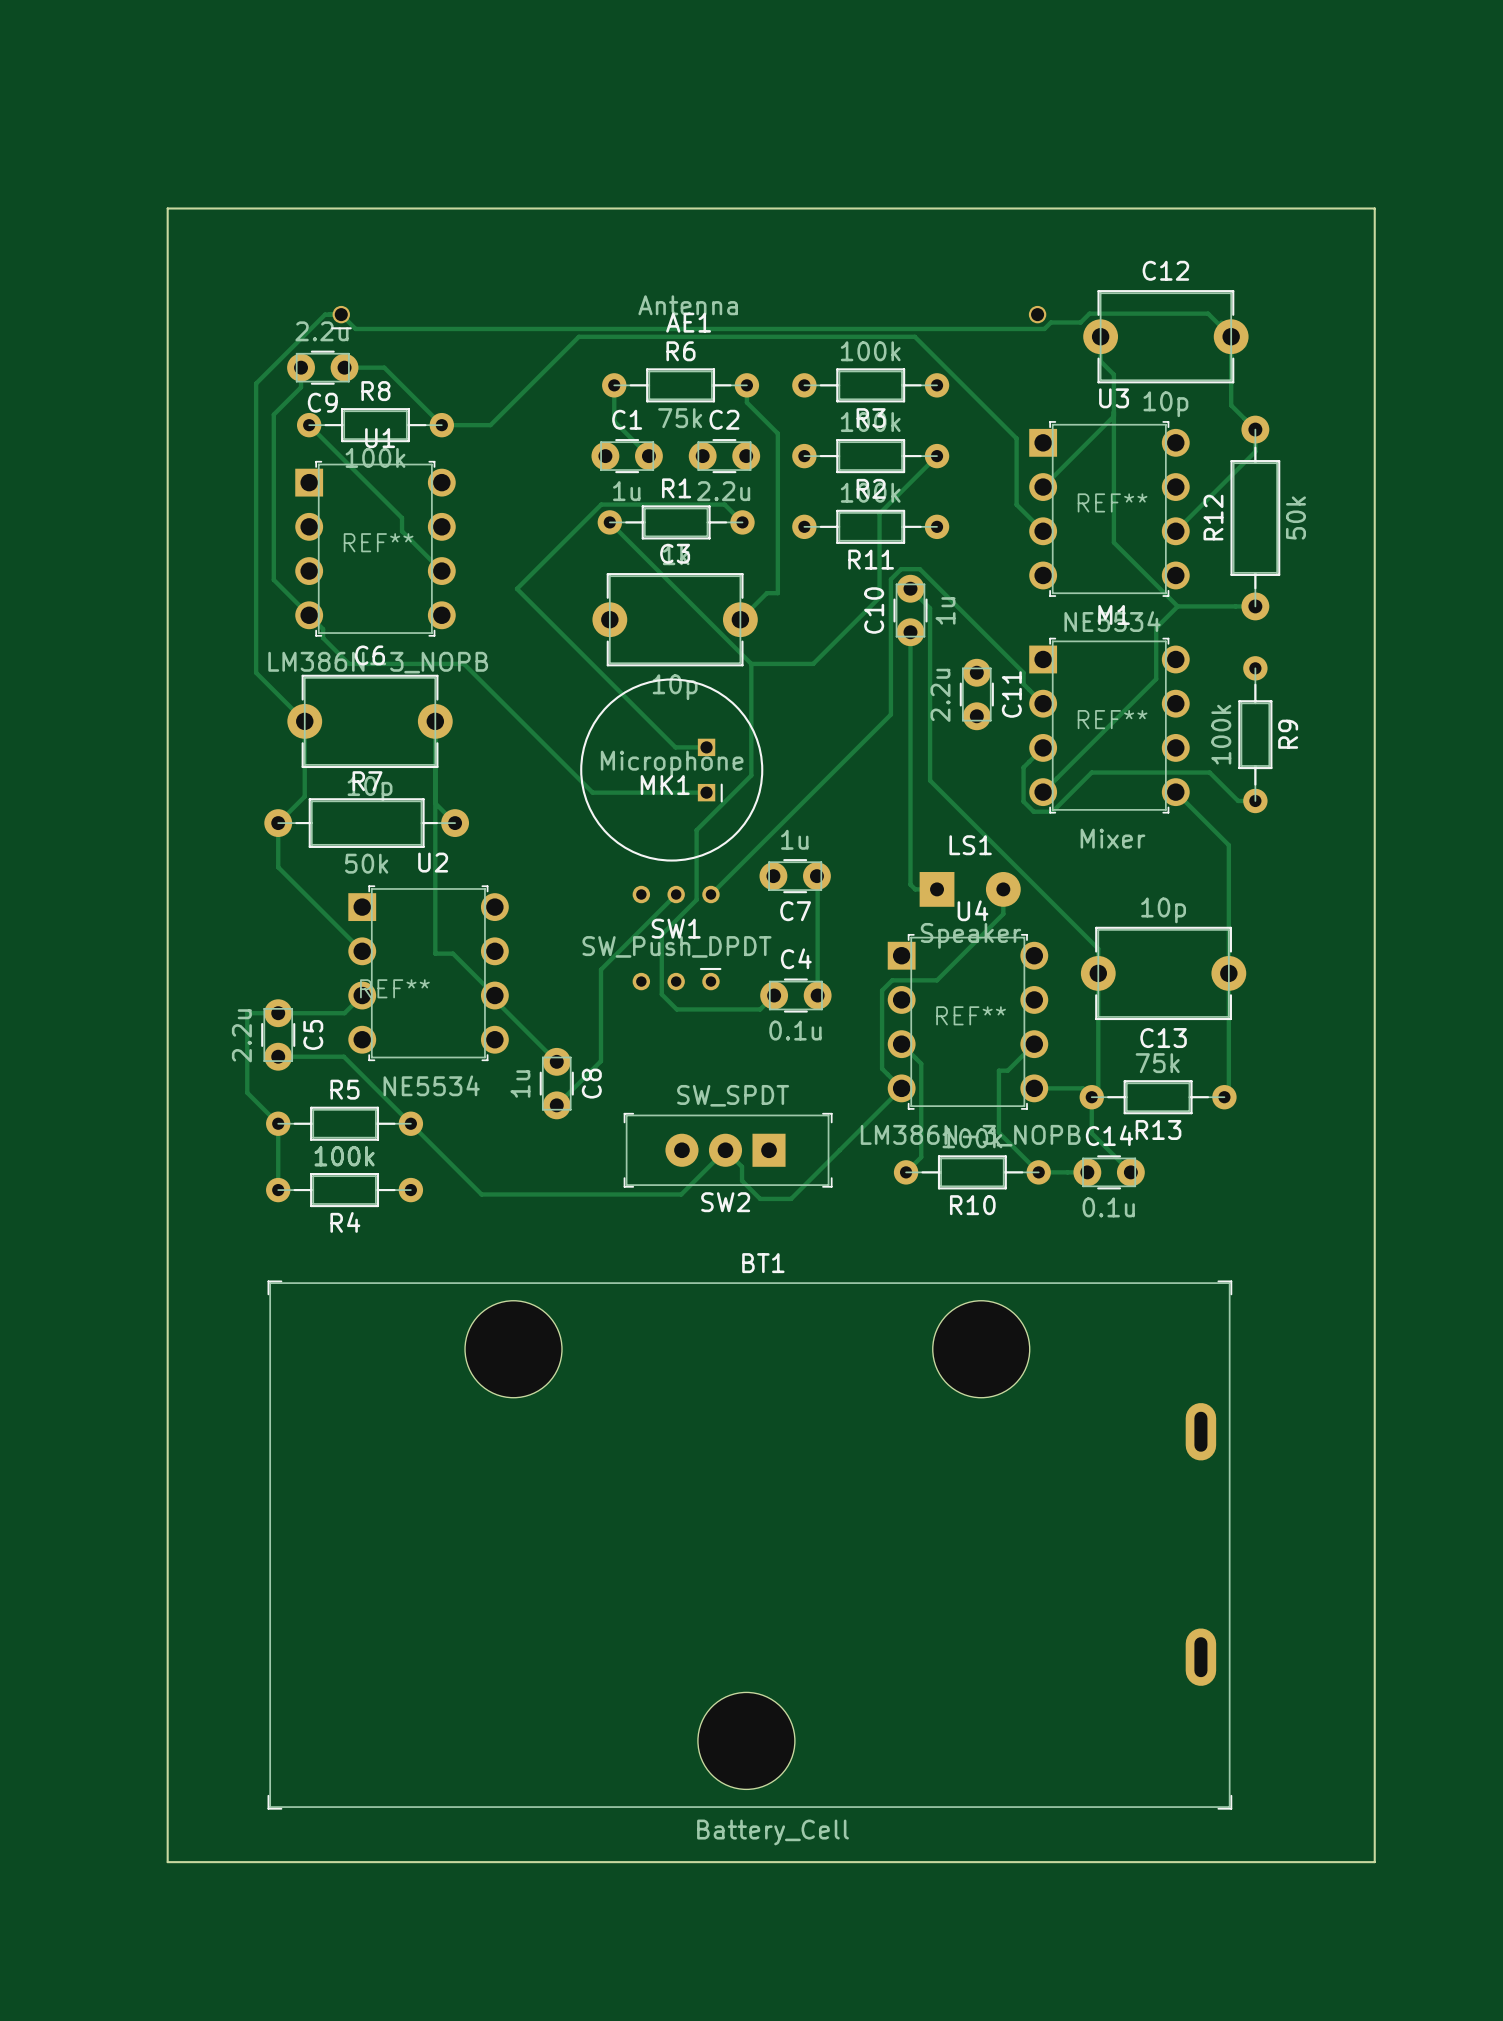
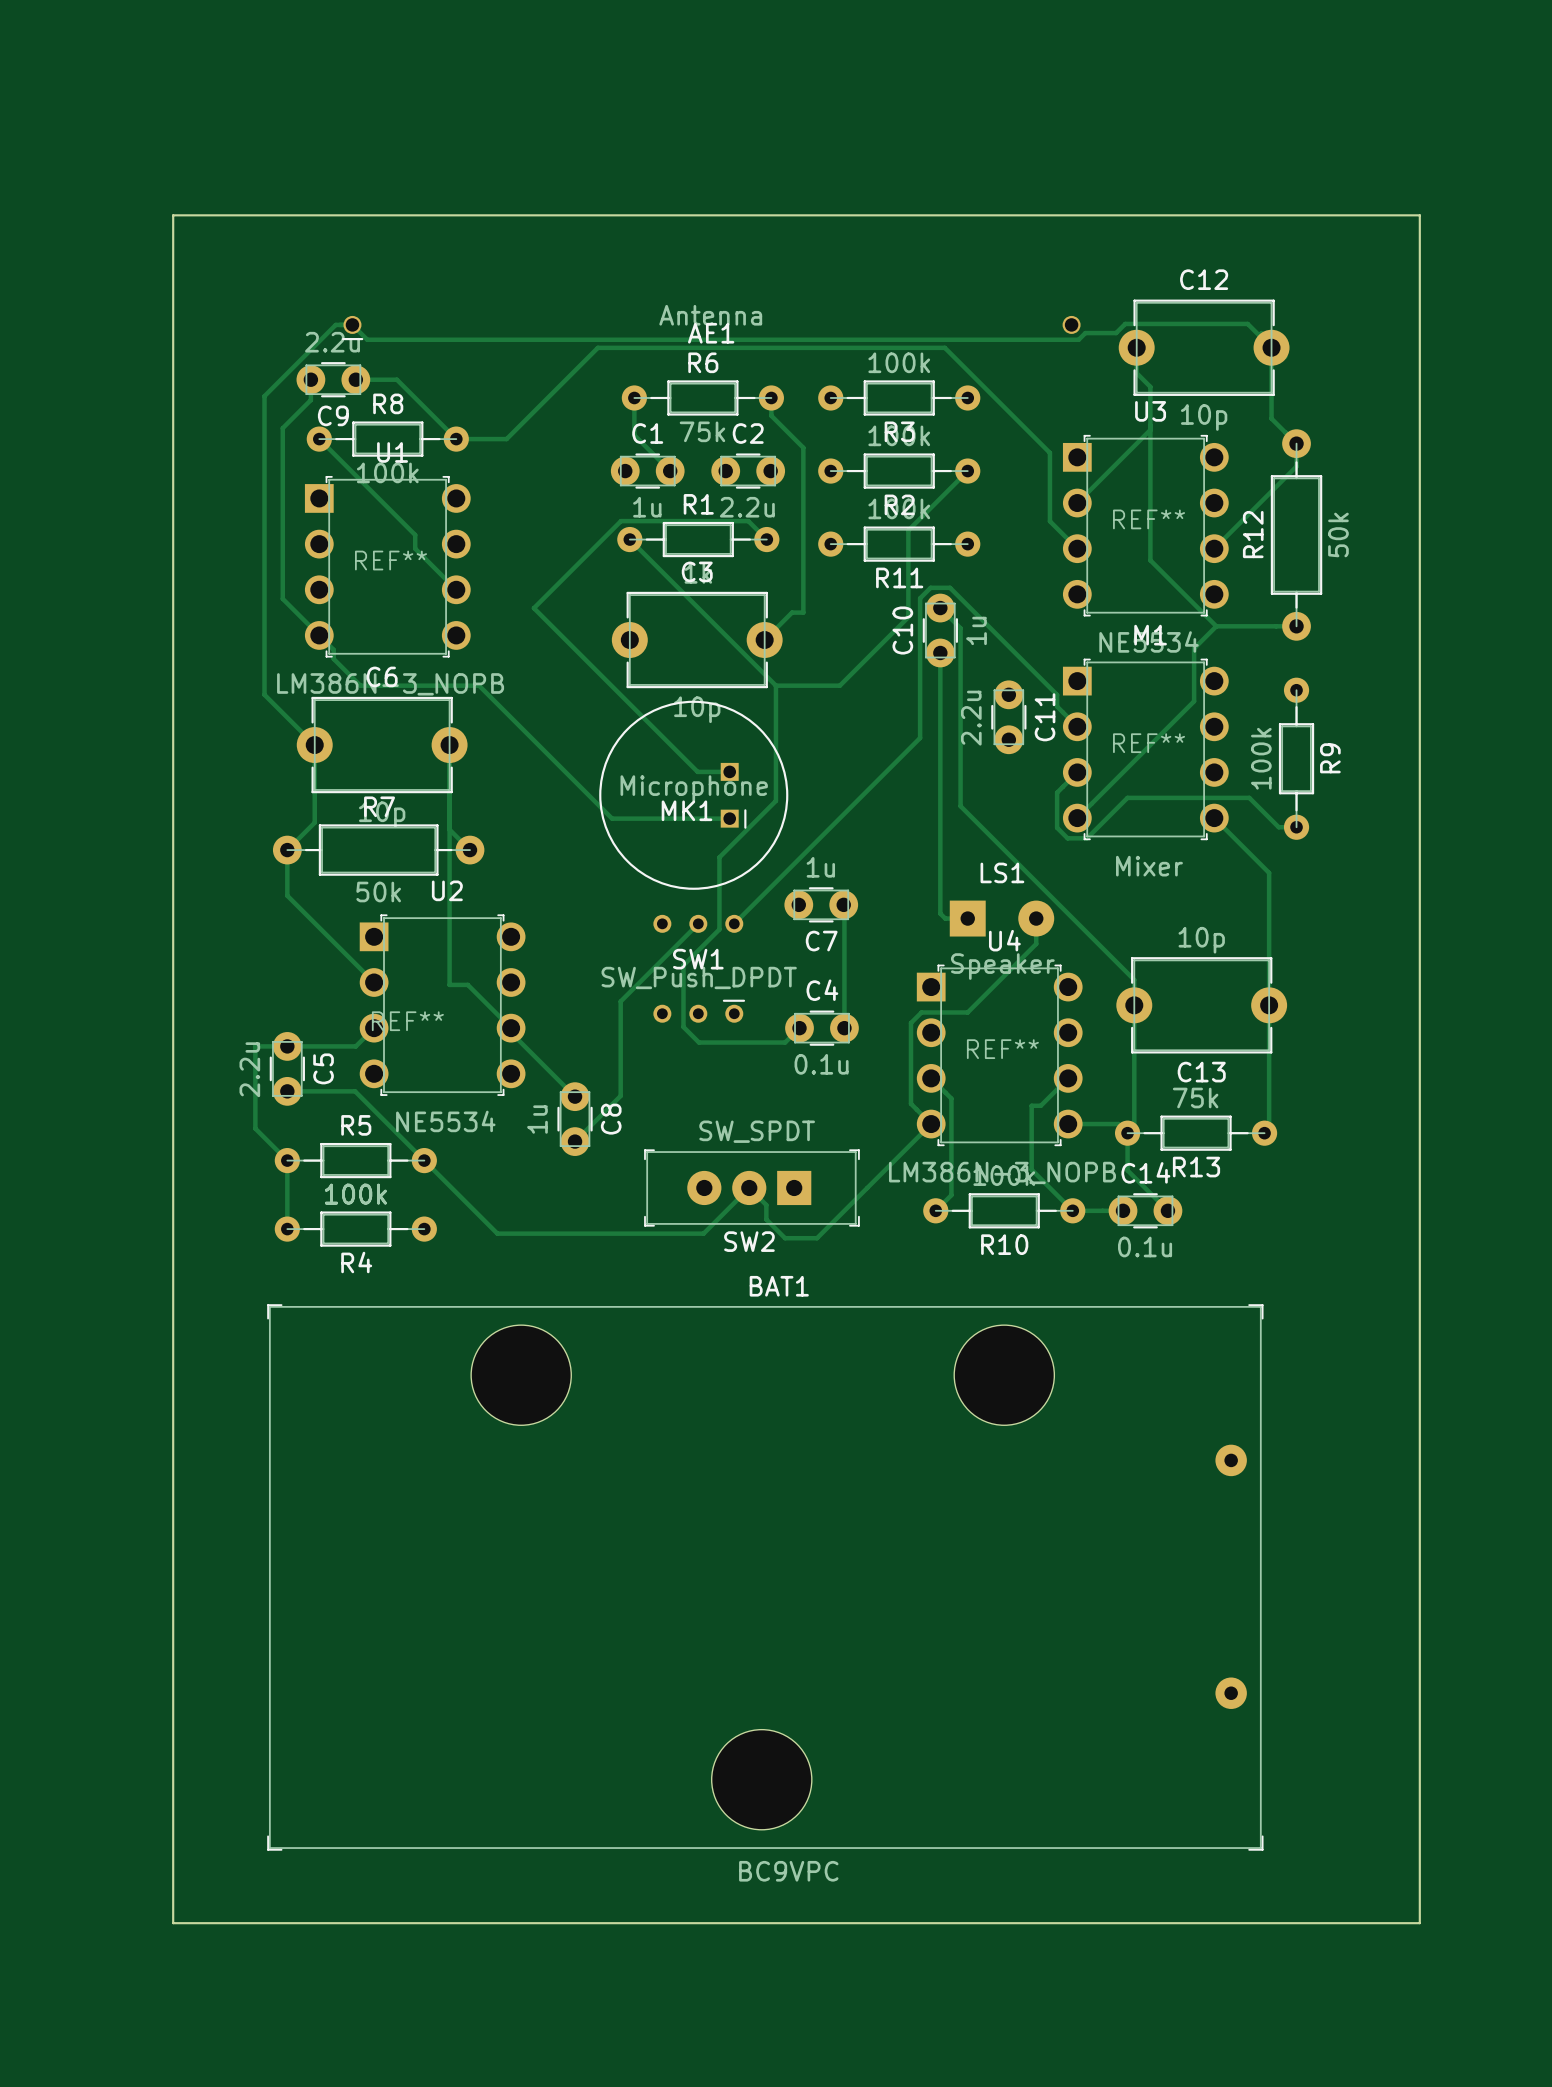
BAT1: none -> BC9VPC (765, 1577)
BT1: Battery_Cell (749, 1545) -> none

